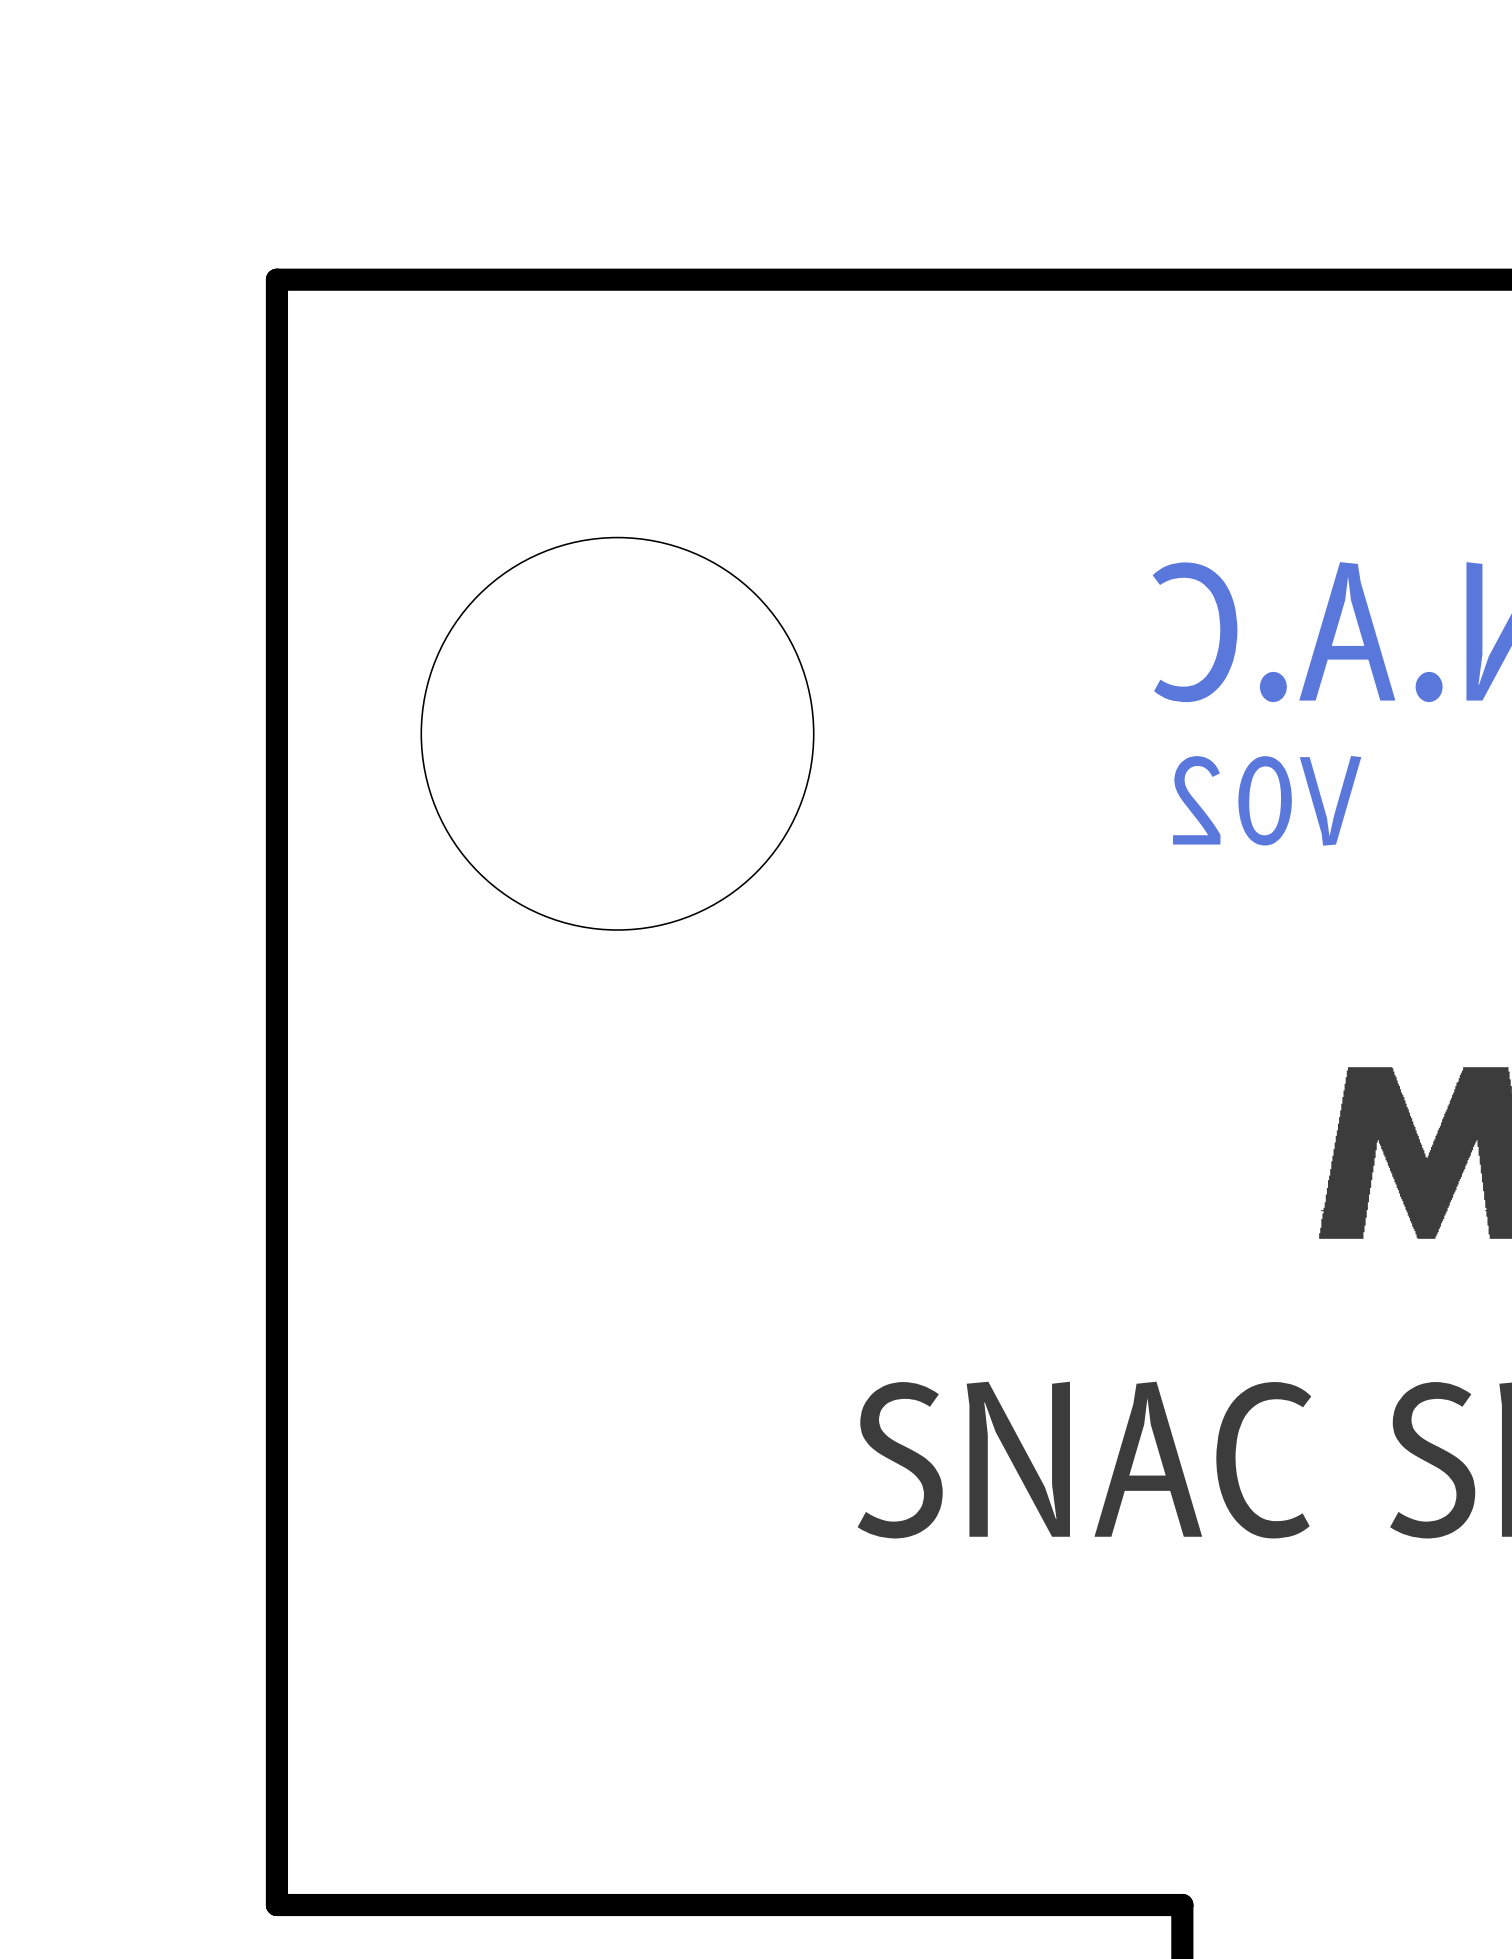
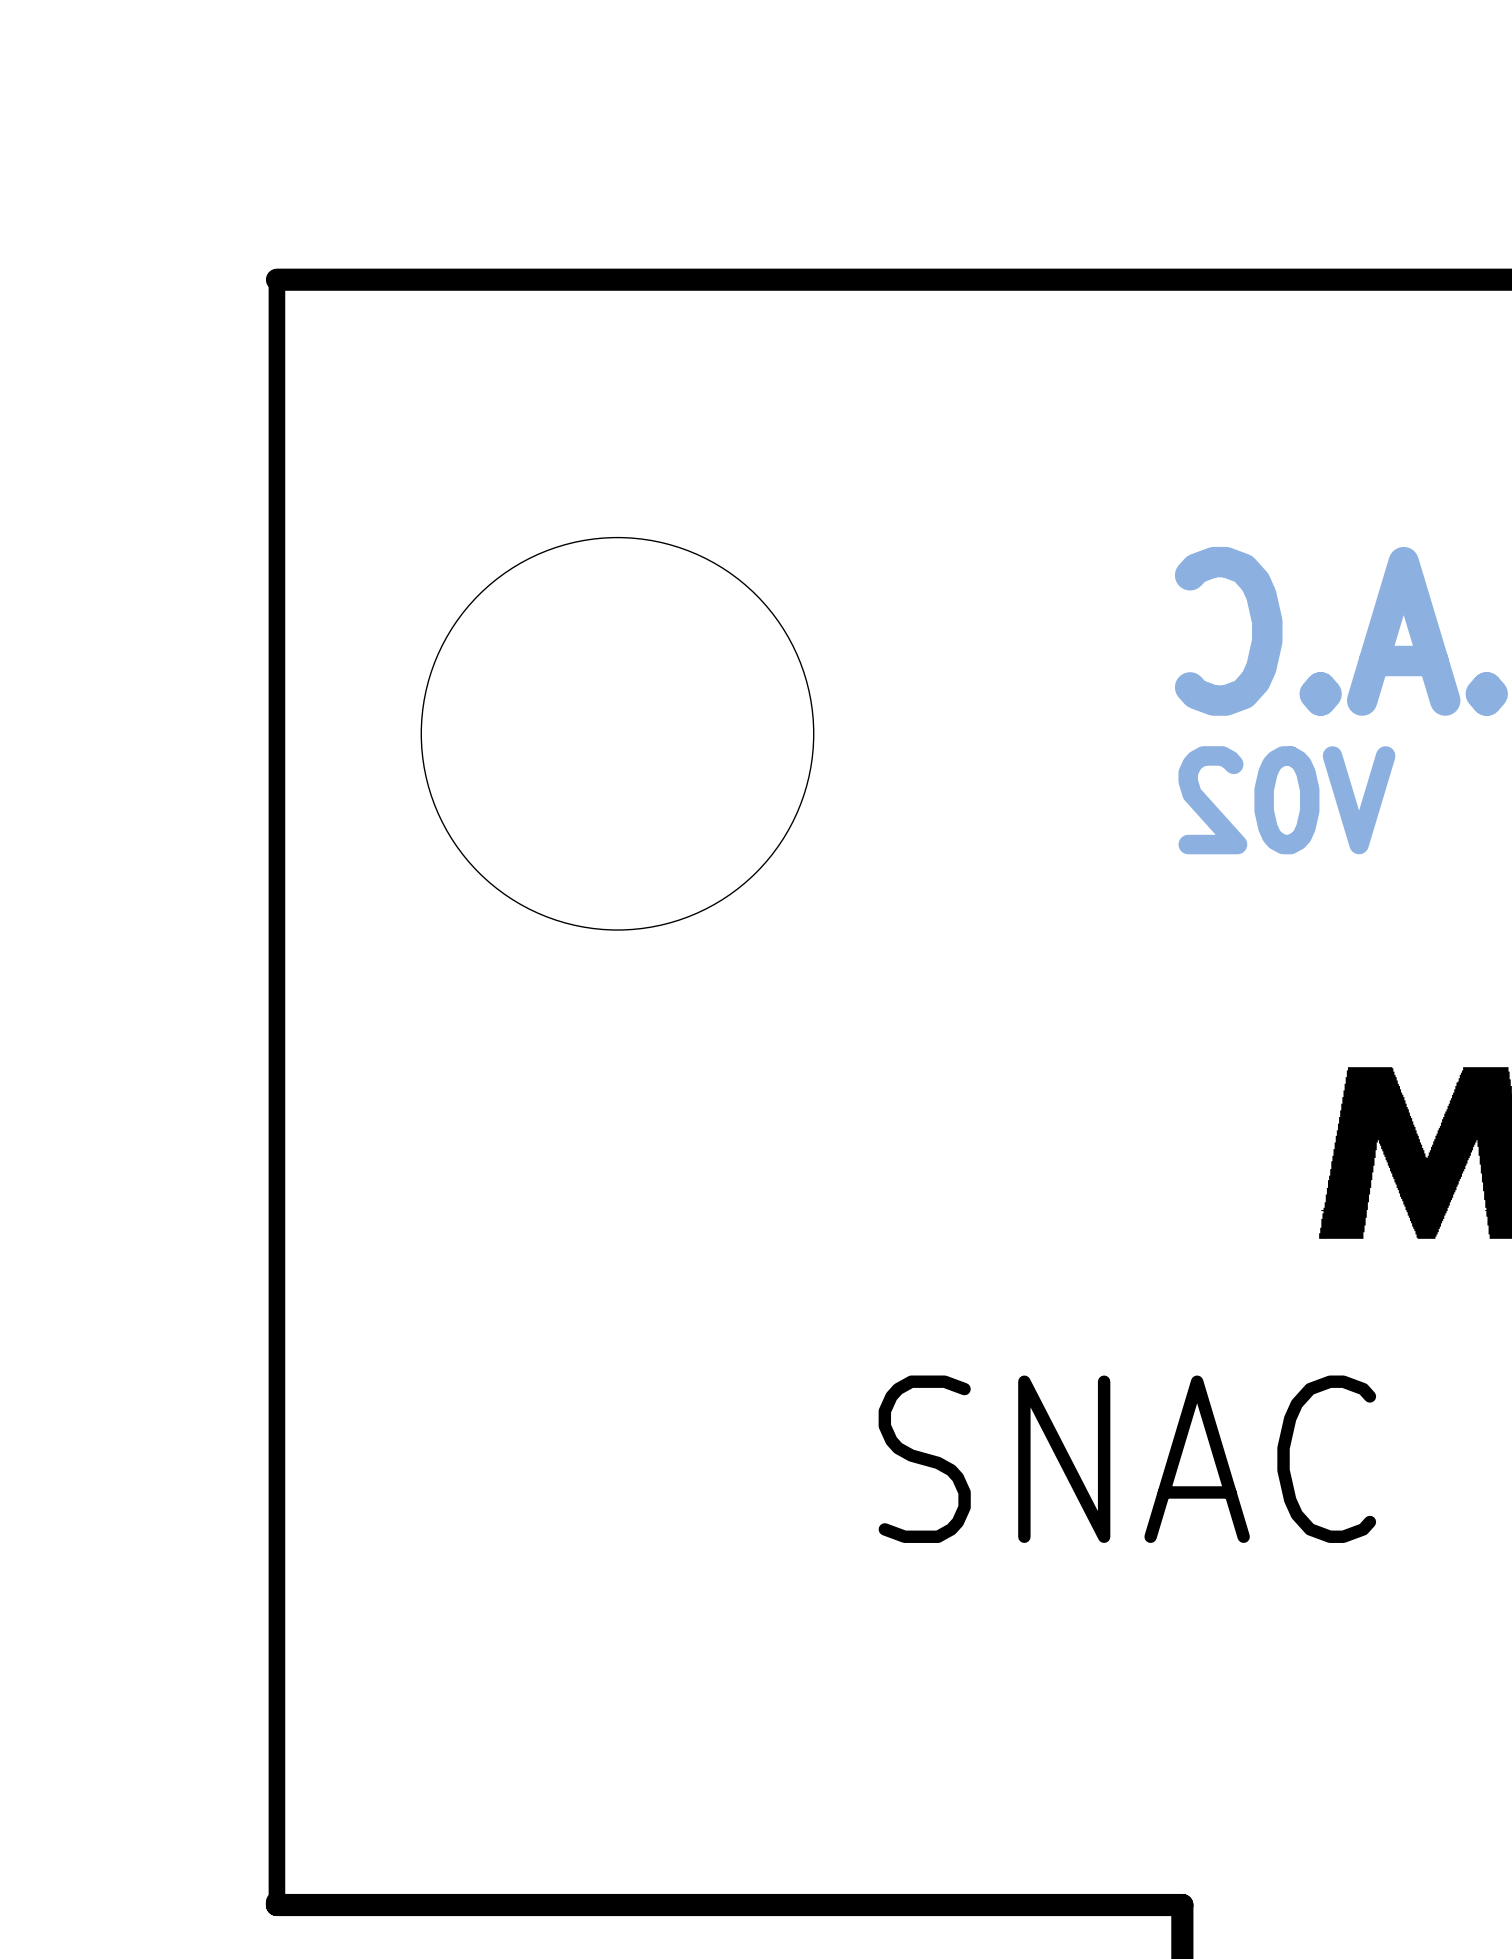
board edge width: thick (276, 279) (276, 1902) -> thin (276, 279) (276, 1902)

